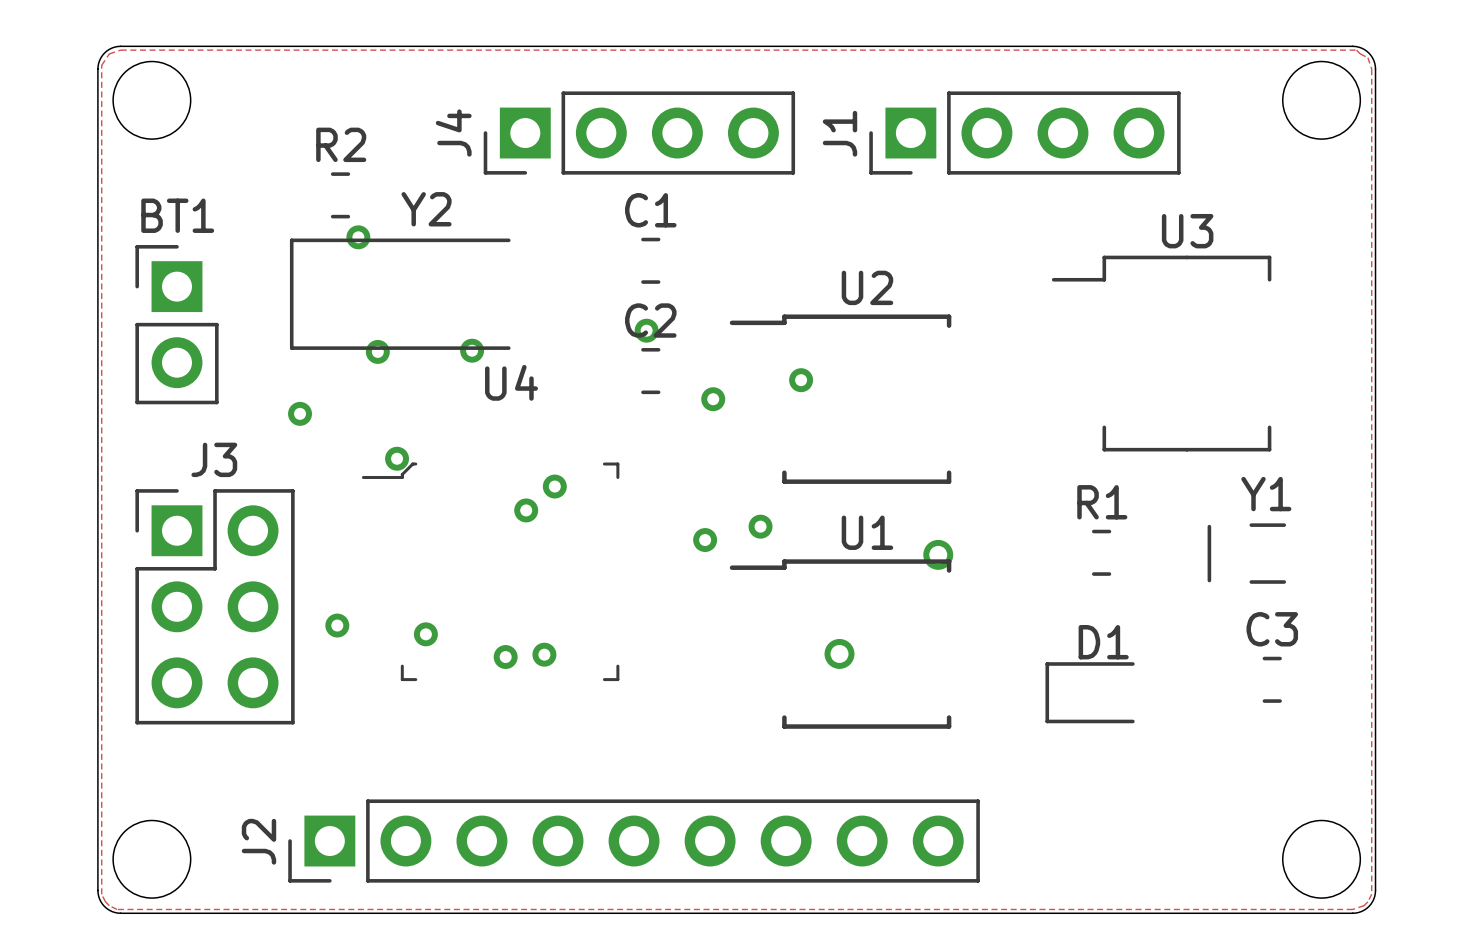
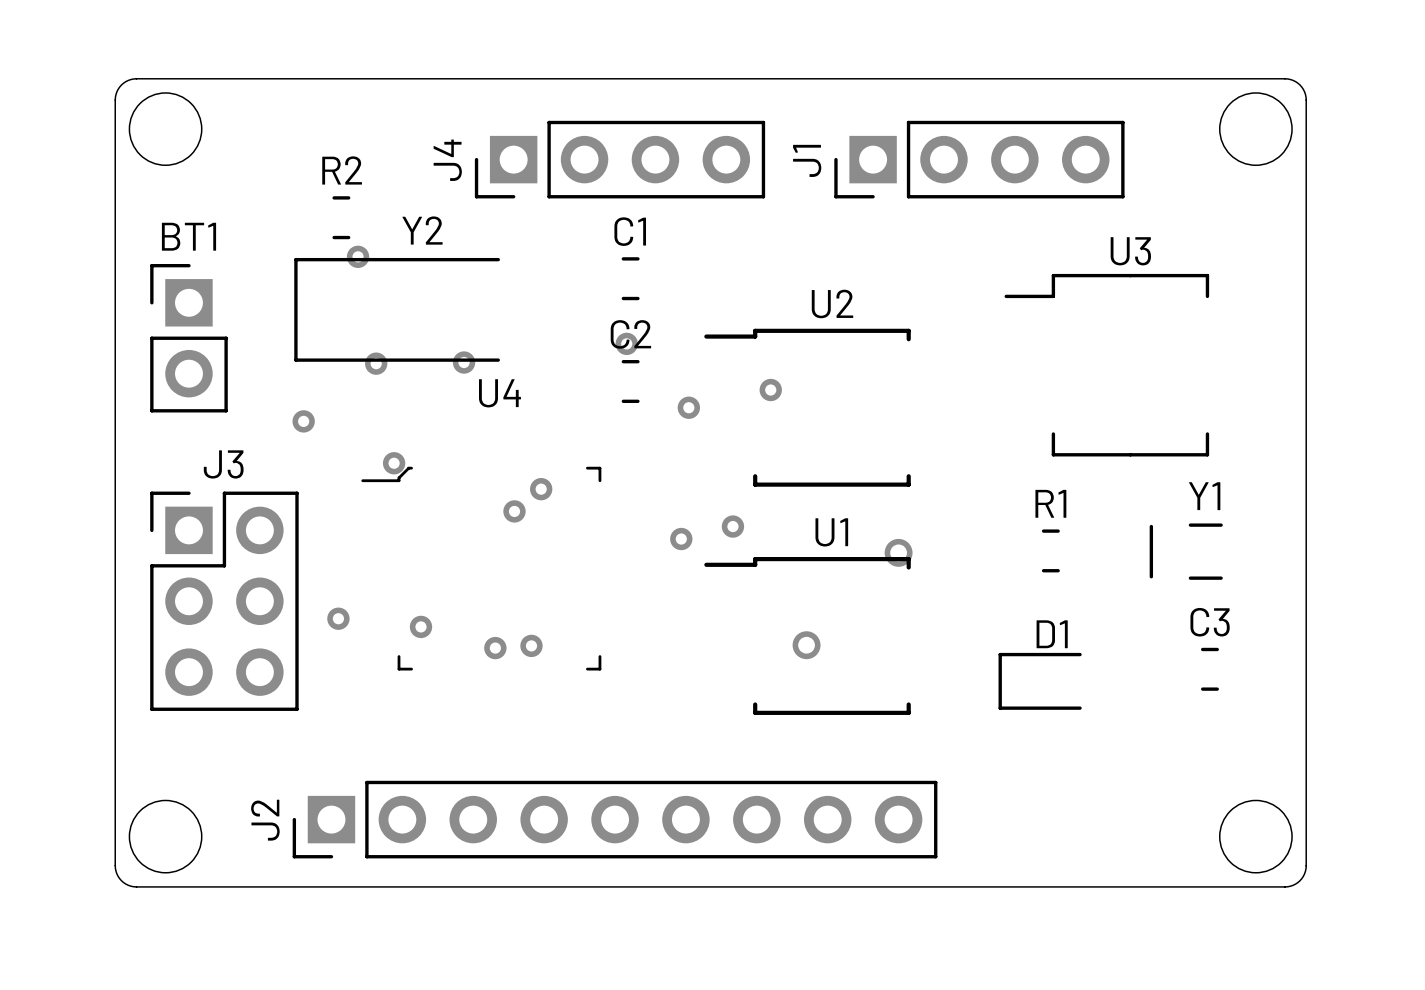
zone outline: (120, 50) (109, 53) (101, 65) (101, 894) (109, 905) (116, 909) (1352, 909) (1364, 905) (1367, 901) (1371, 894) (1371, 69) (1367, 57) (1356, 50) (120, 50) -> none

